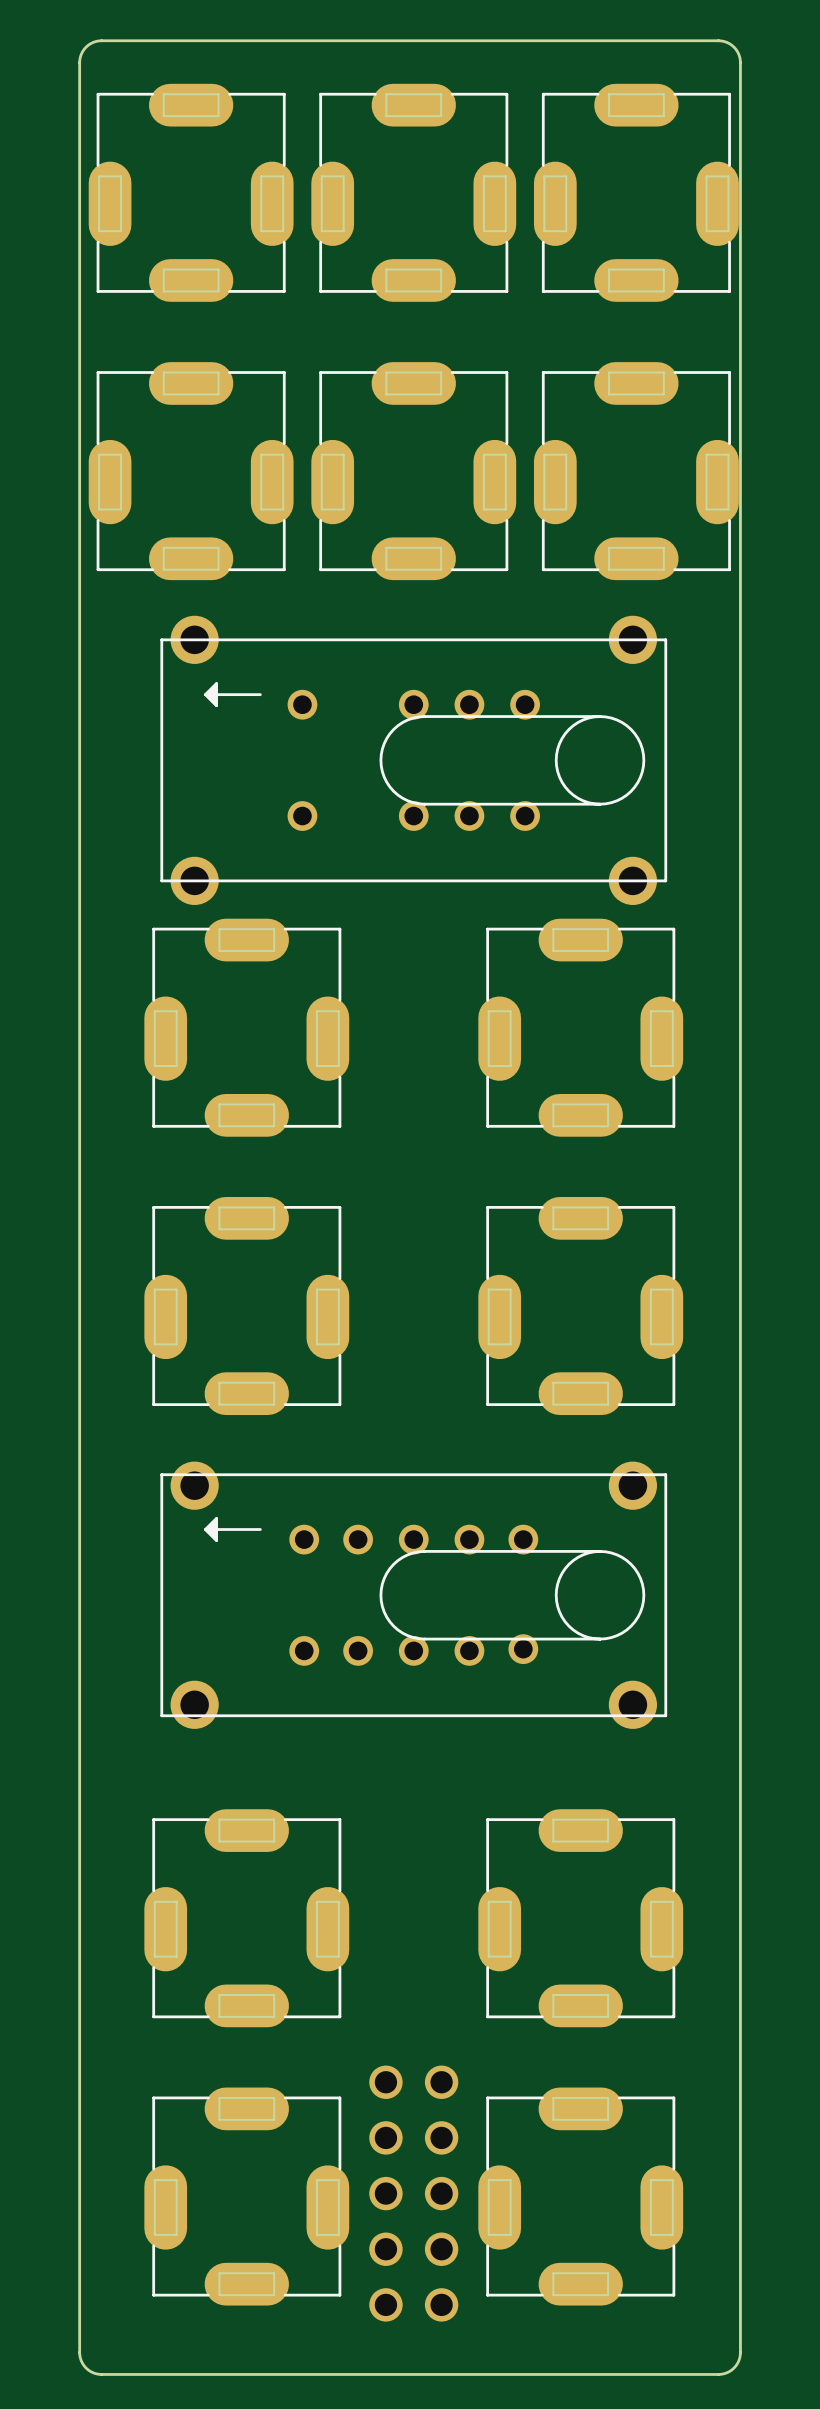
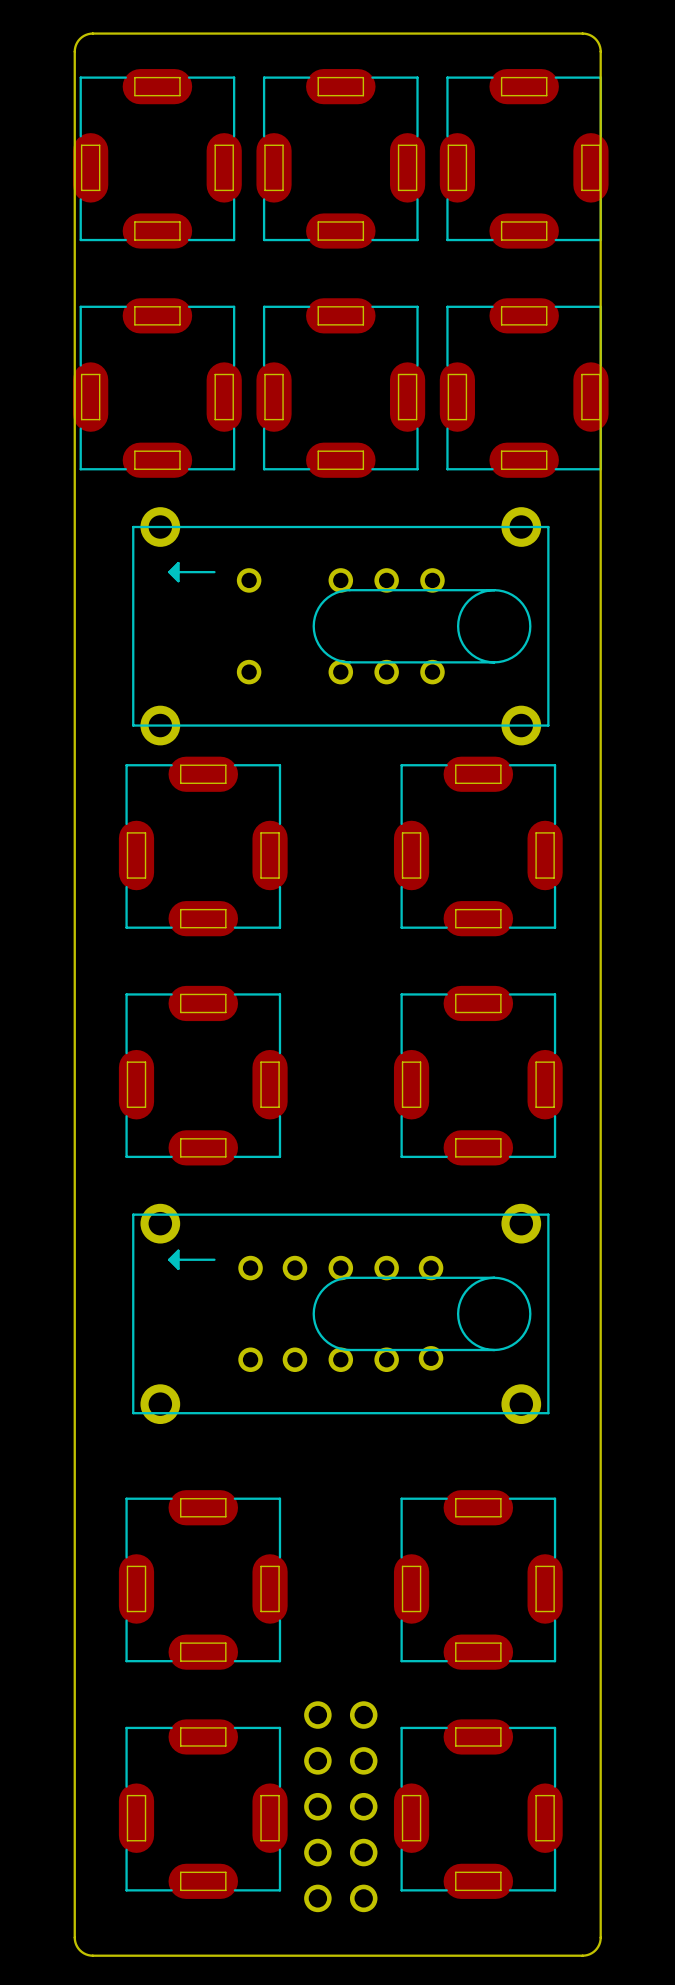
drawing shape: [78, 39, 742, 2376] -> [73, 32, 602, 1957]

